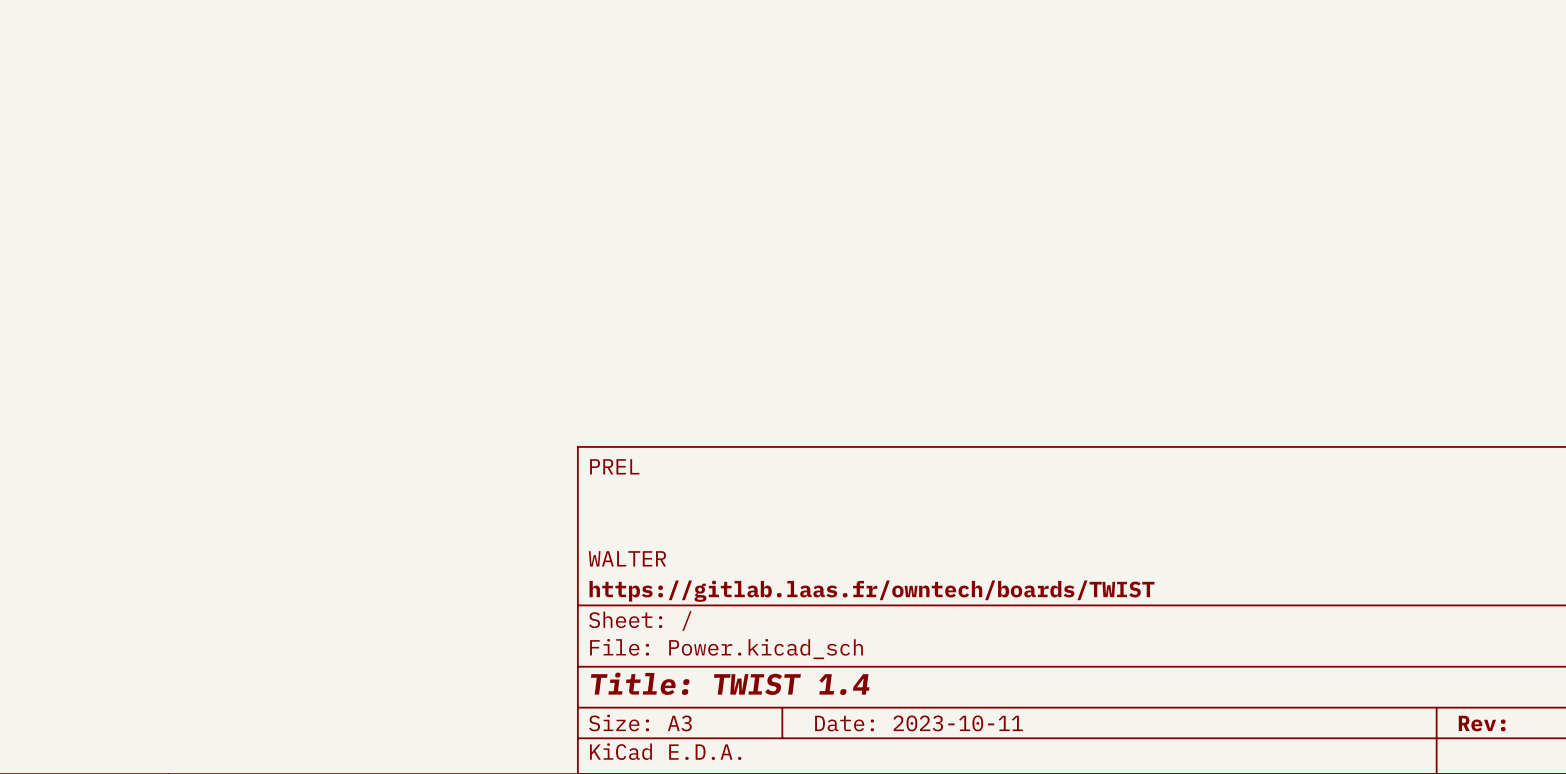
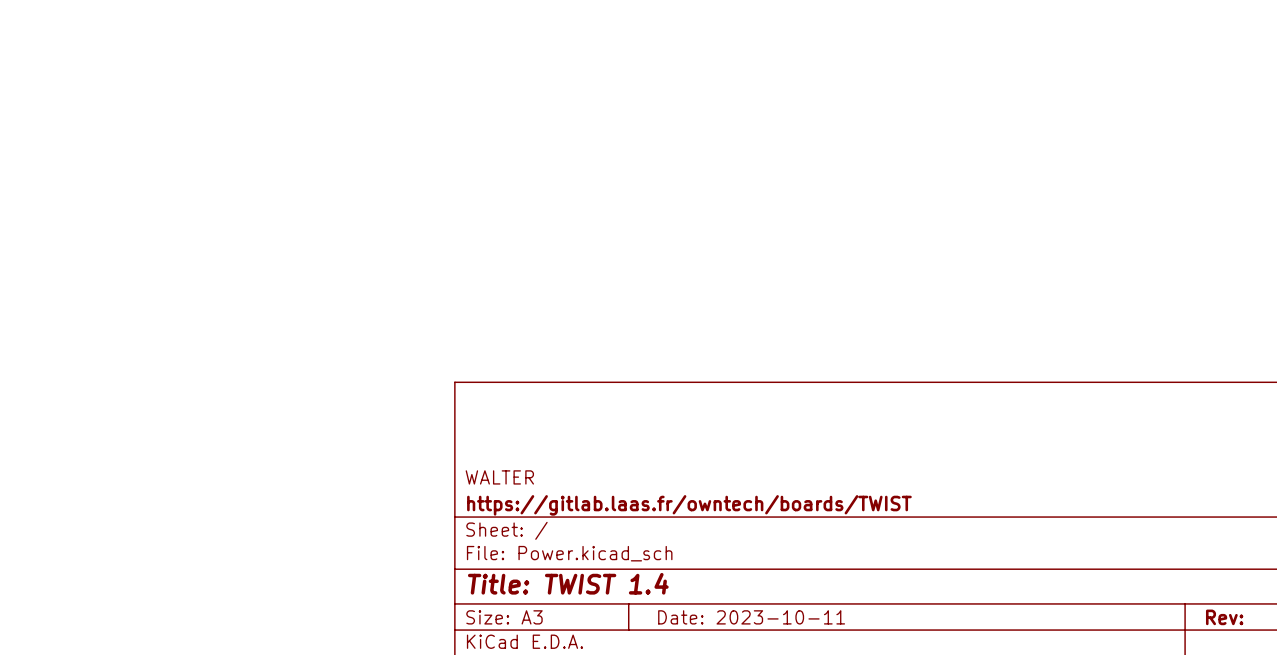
title block: PREL (614, 466) -> none

